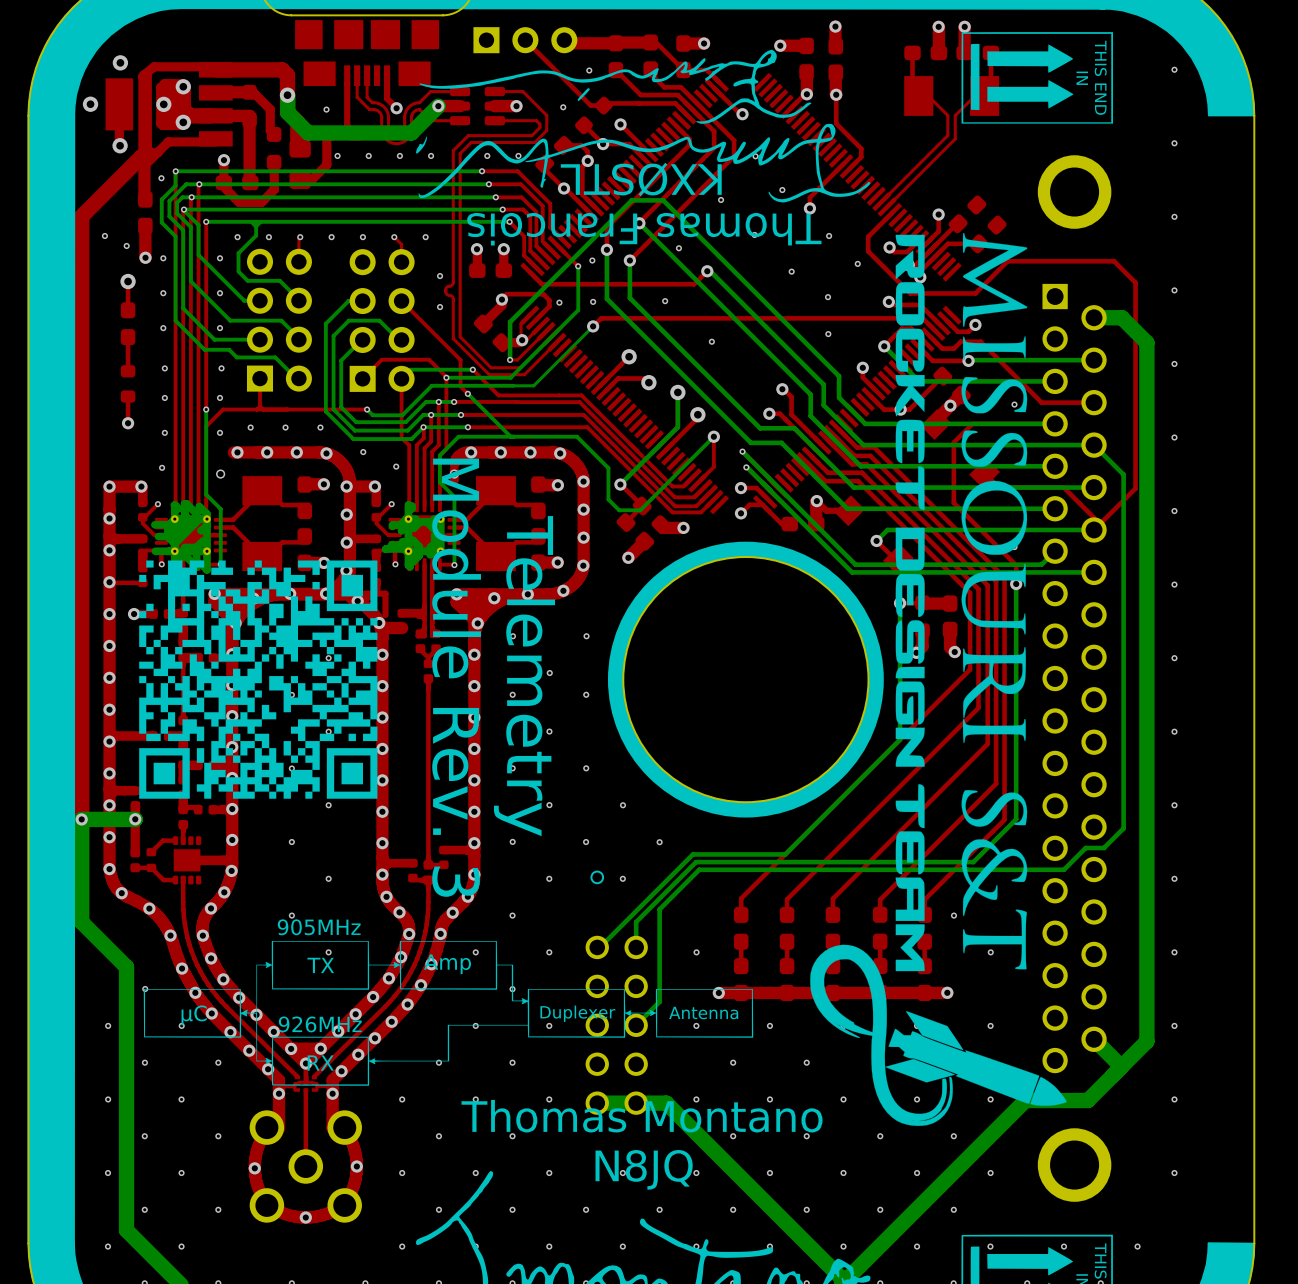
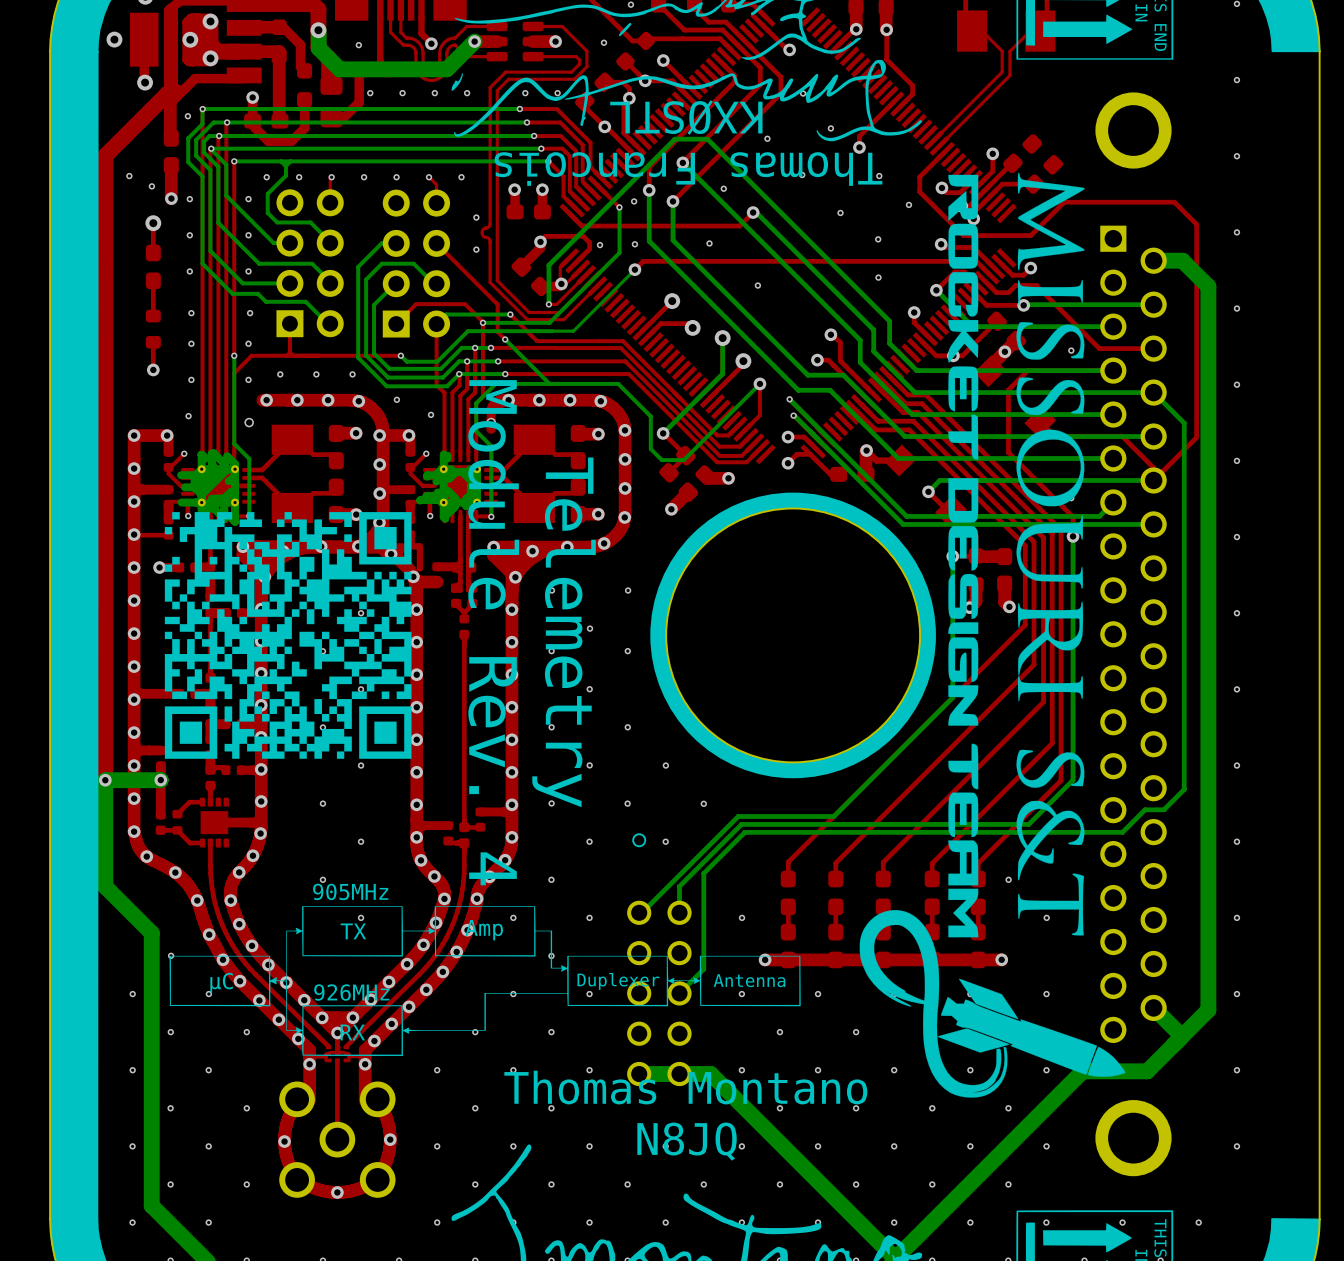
text: Module Rev. 3 (456, 677) -> Module Rev. 4 (493, 632)

